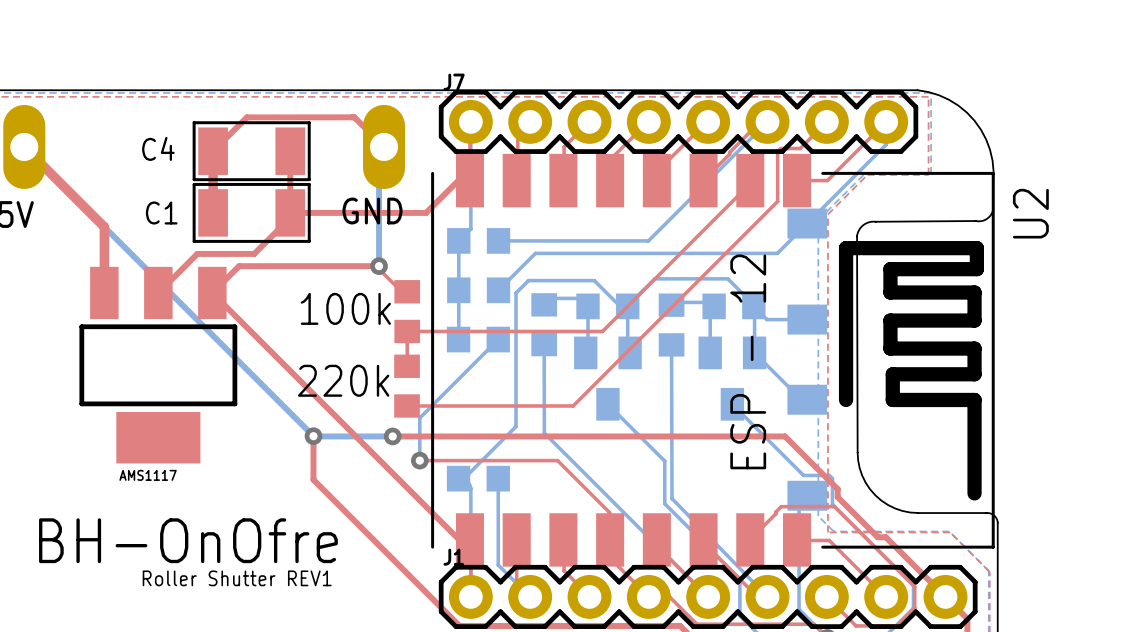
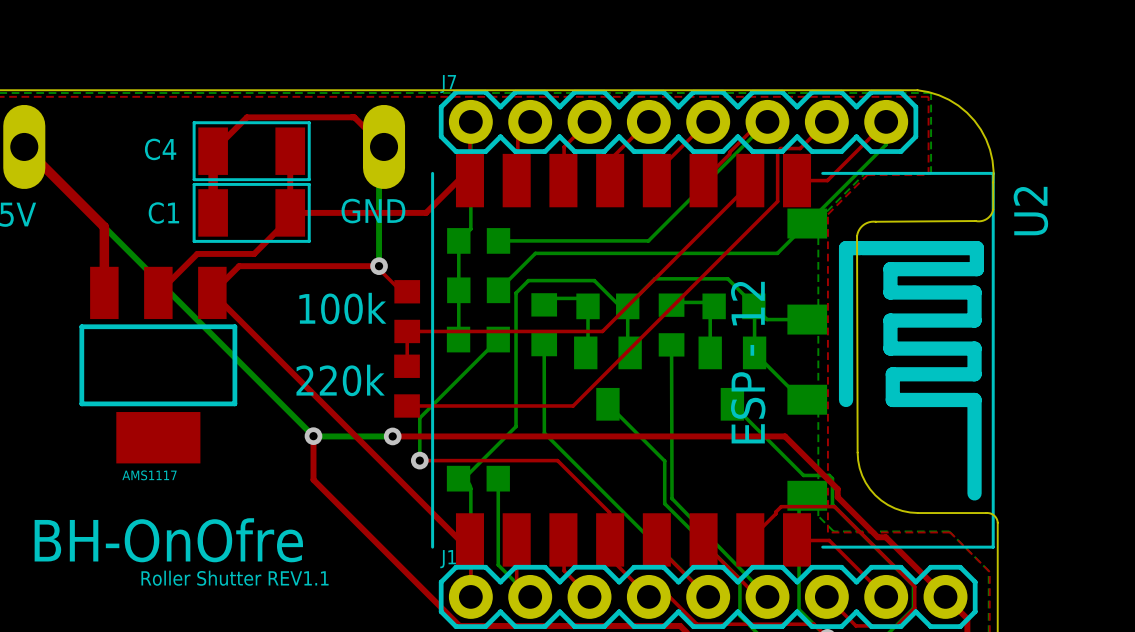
text: Roller Shutter REV1 (237, 578) -> Roller Shutter REV1.1 (235, 578)

